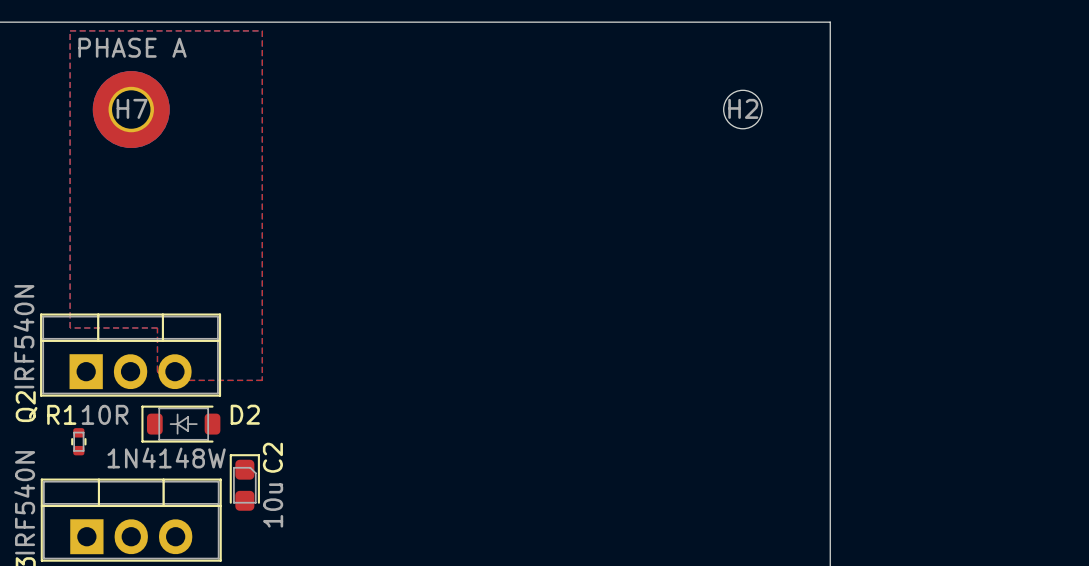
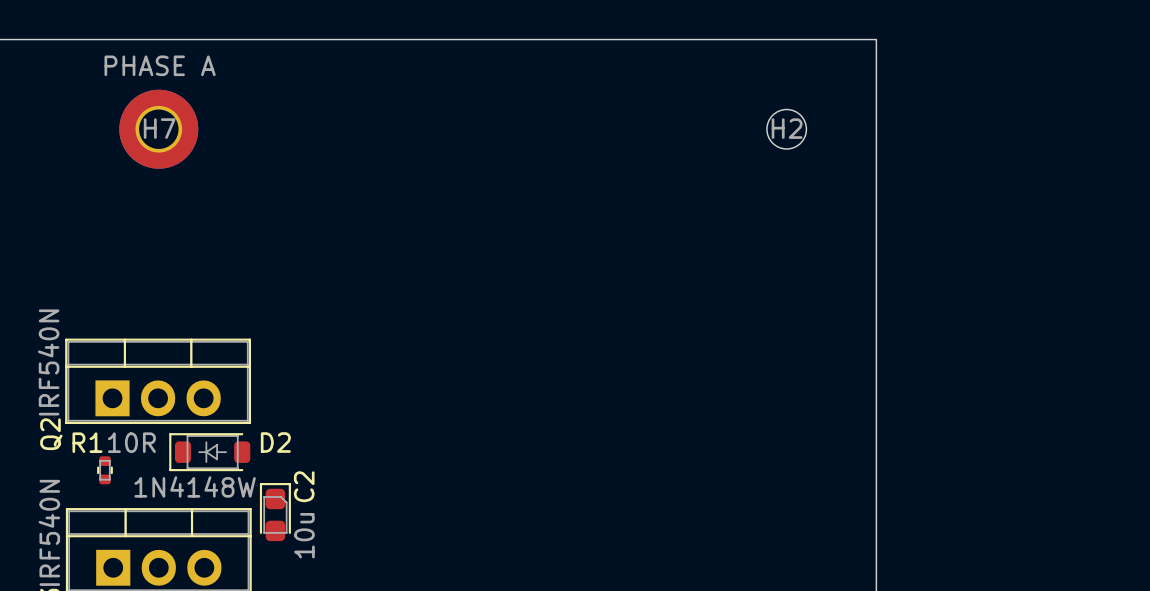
top zone outline: (70, 30) (262, 30) (262, 380) (166, 380) (157, 371) (157, 327) (70, 327) (70, 30) -> none

